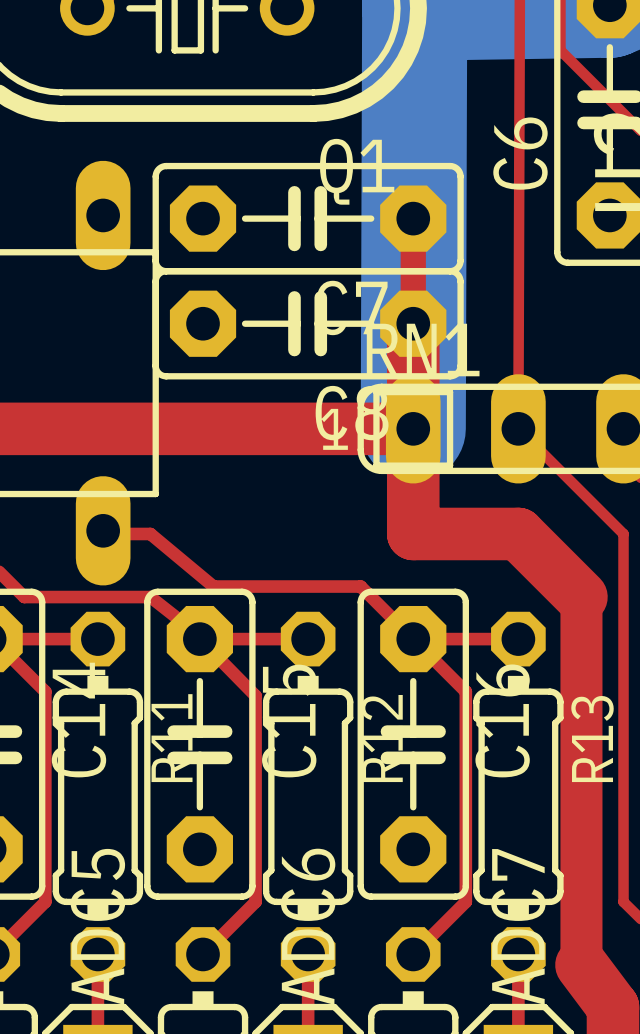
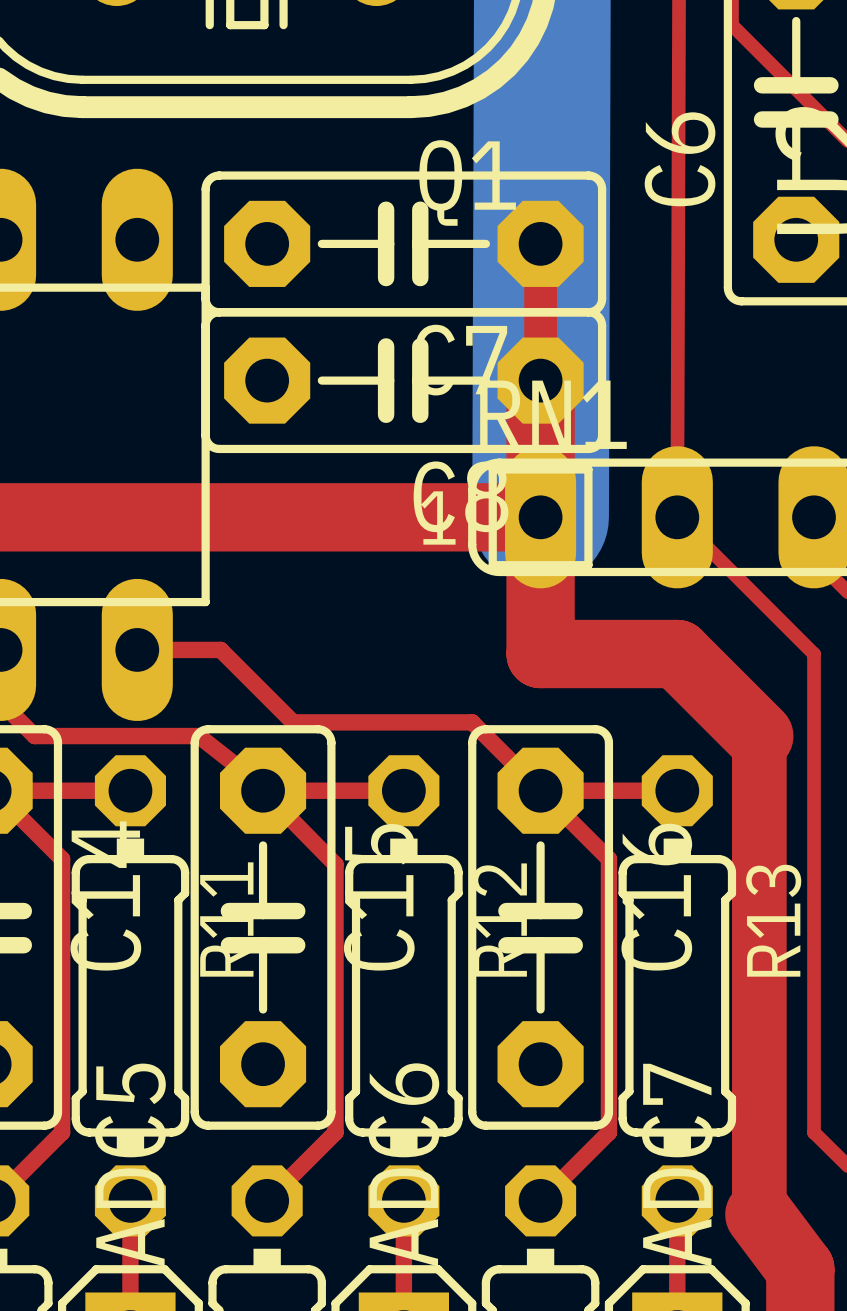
top track: (103, 530) (97, 530) (97, 533) (150, 533) (213, 586) (223, 586) -> (137, 649) (220, 649) (293, 722)

